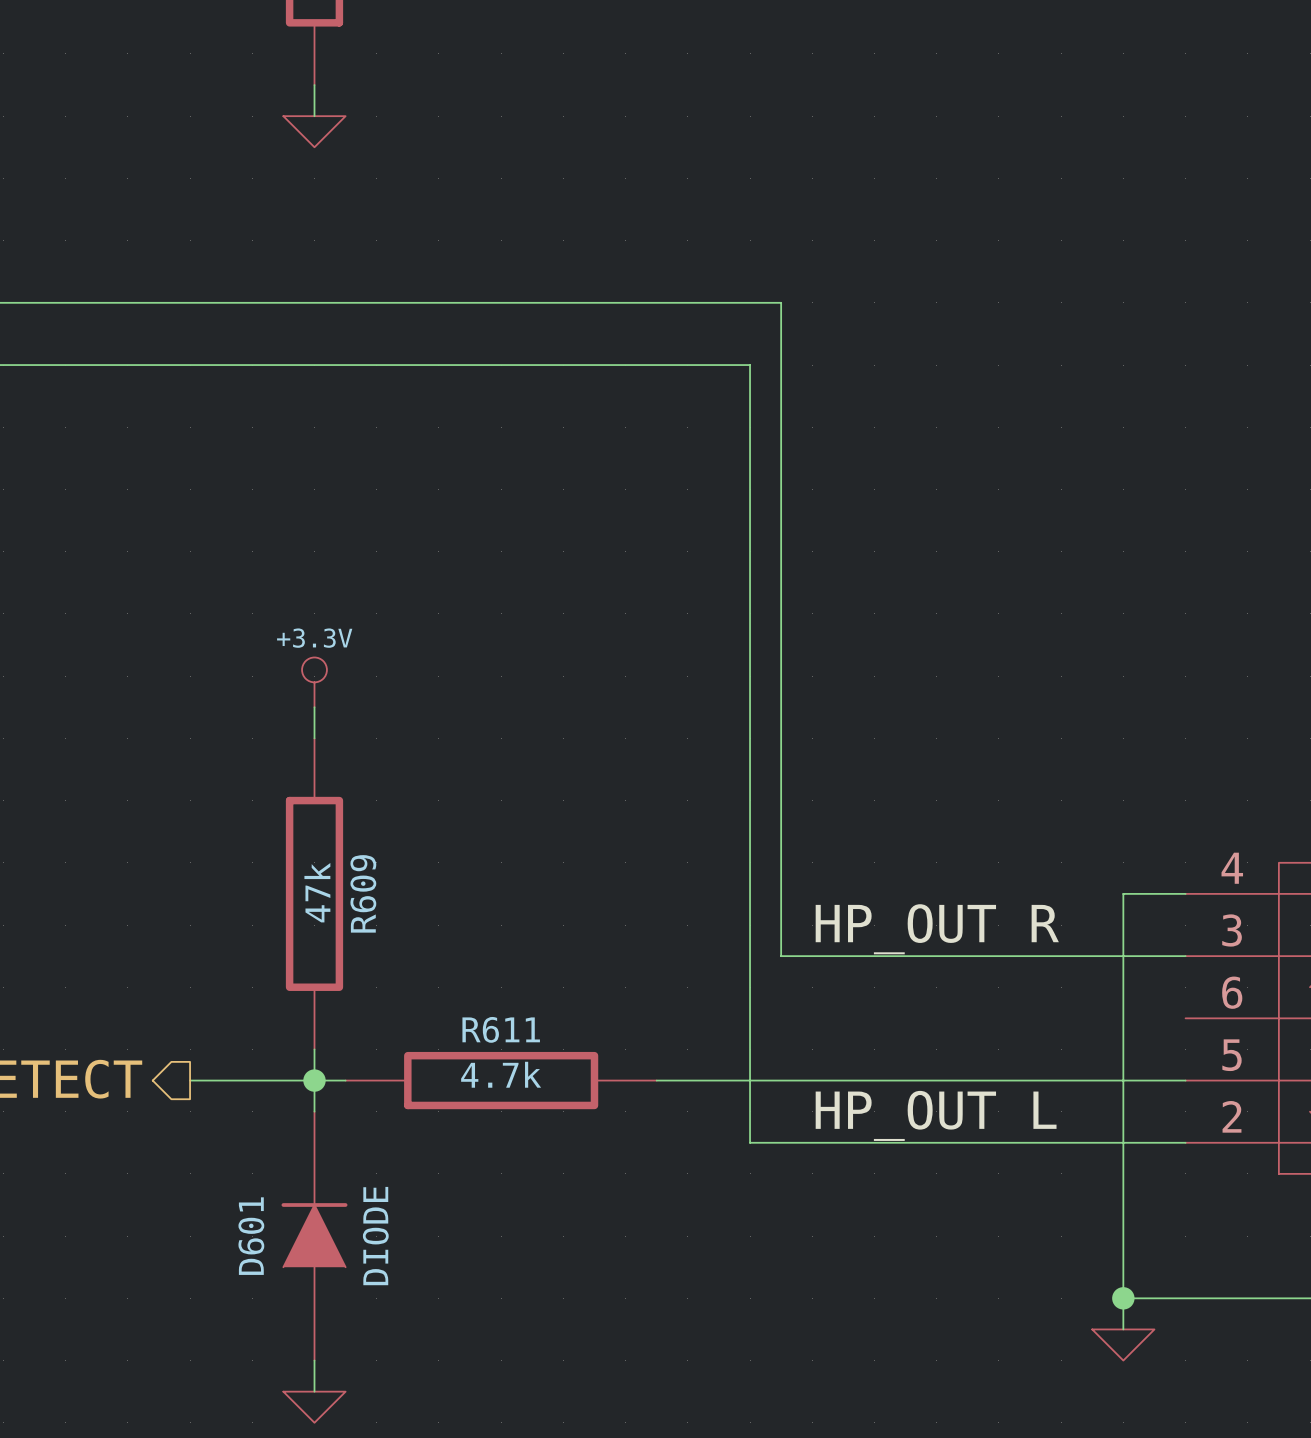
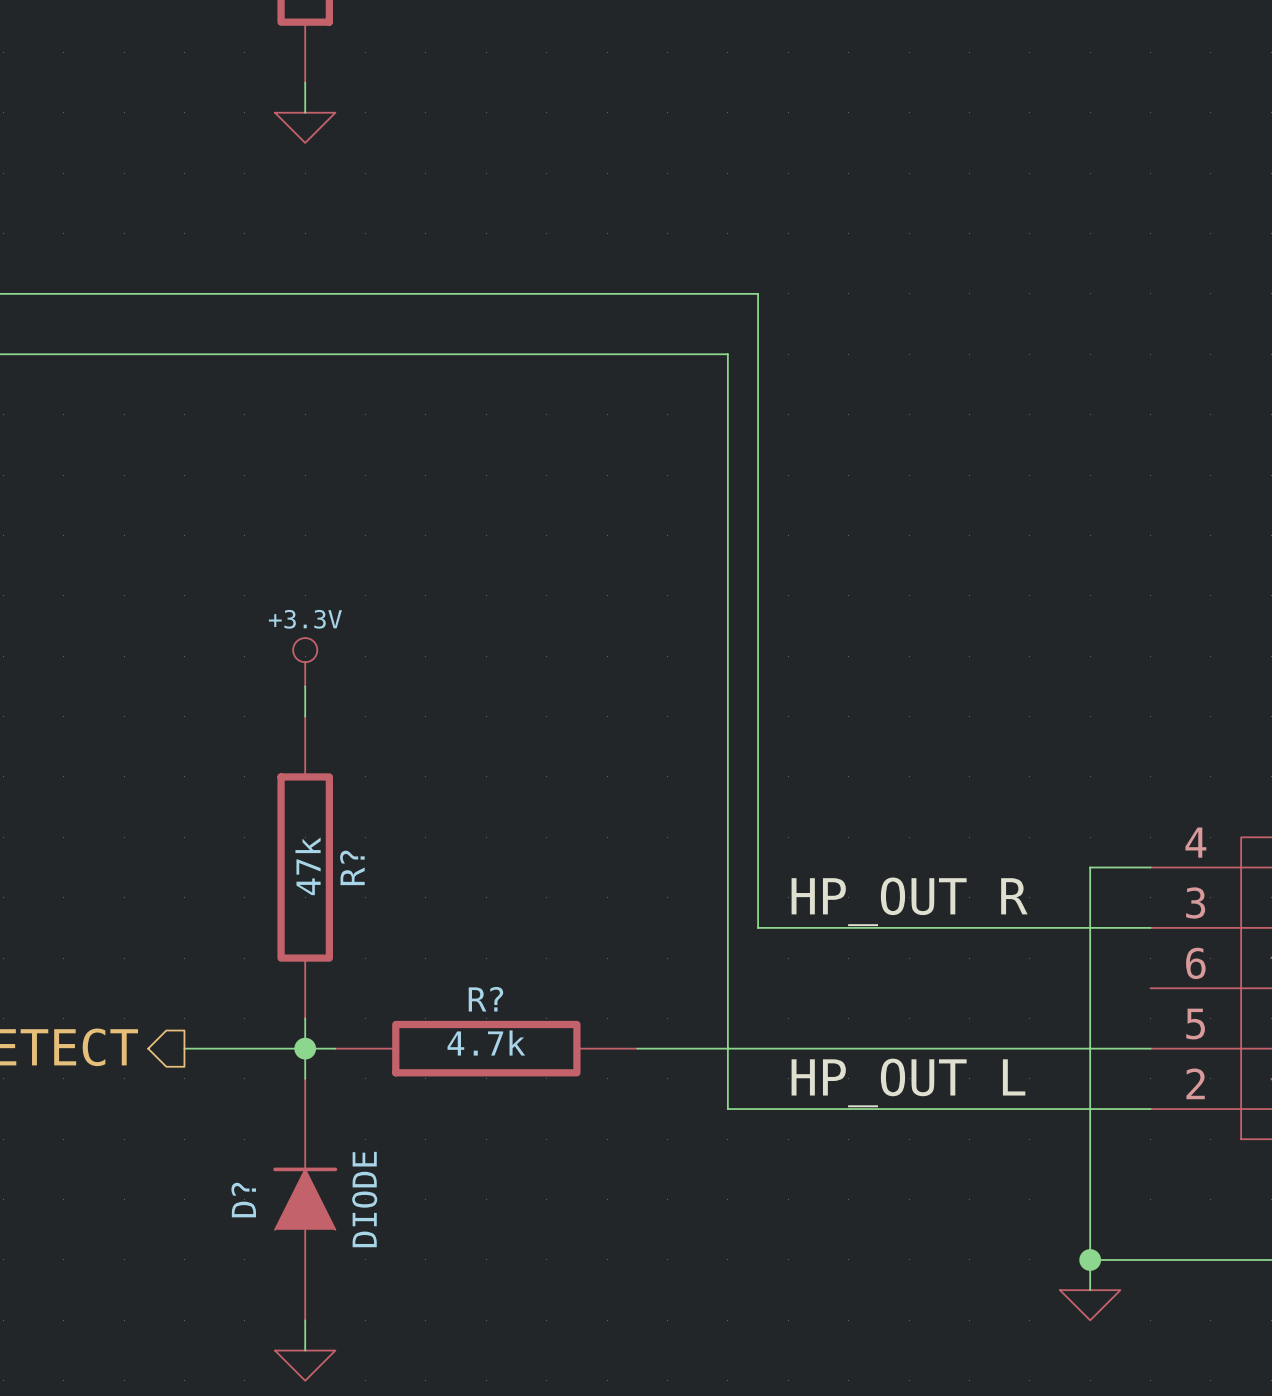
R609 name: R609 (363, 893) -> R? (352, 867)
R611 name: R611 (501, 1029) -> R? (485, 999)
D601 name: D601 (251, 1236) -> D? (243, 1200)

